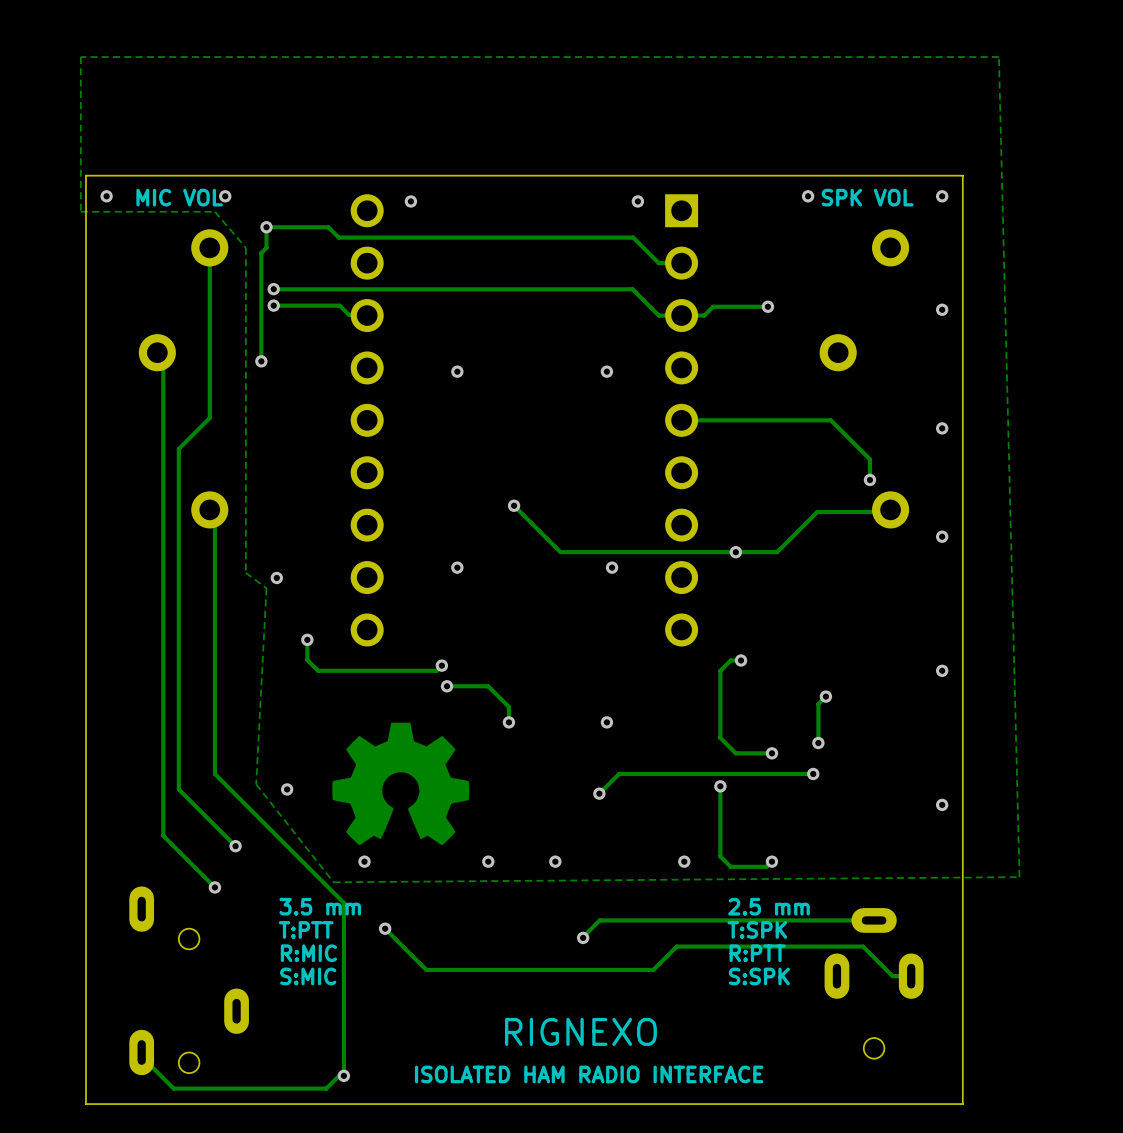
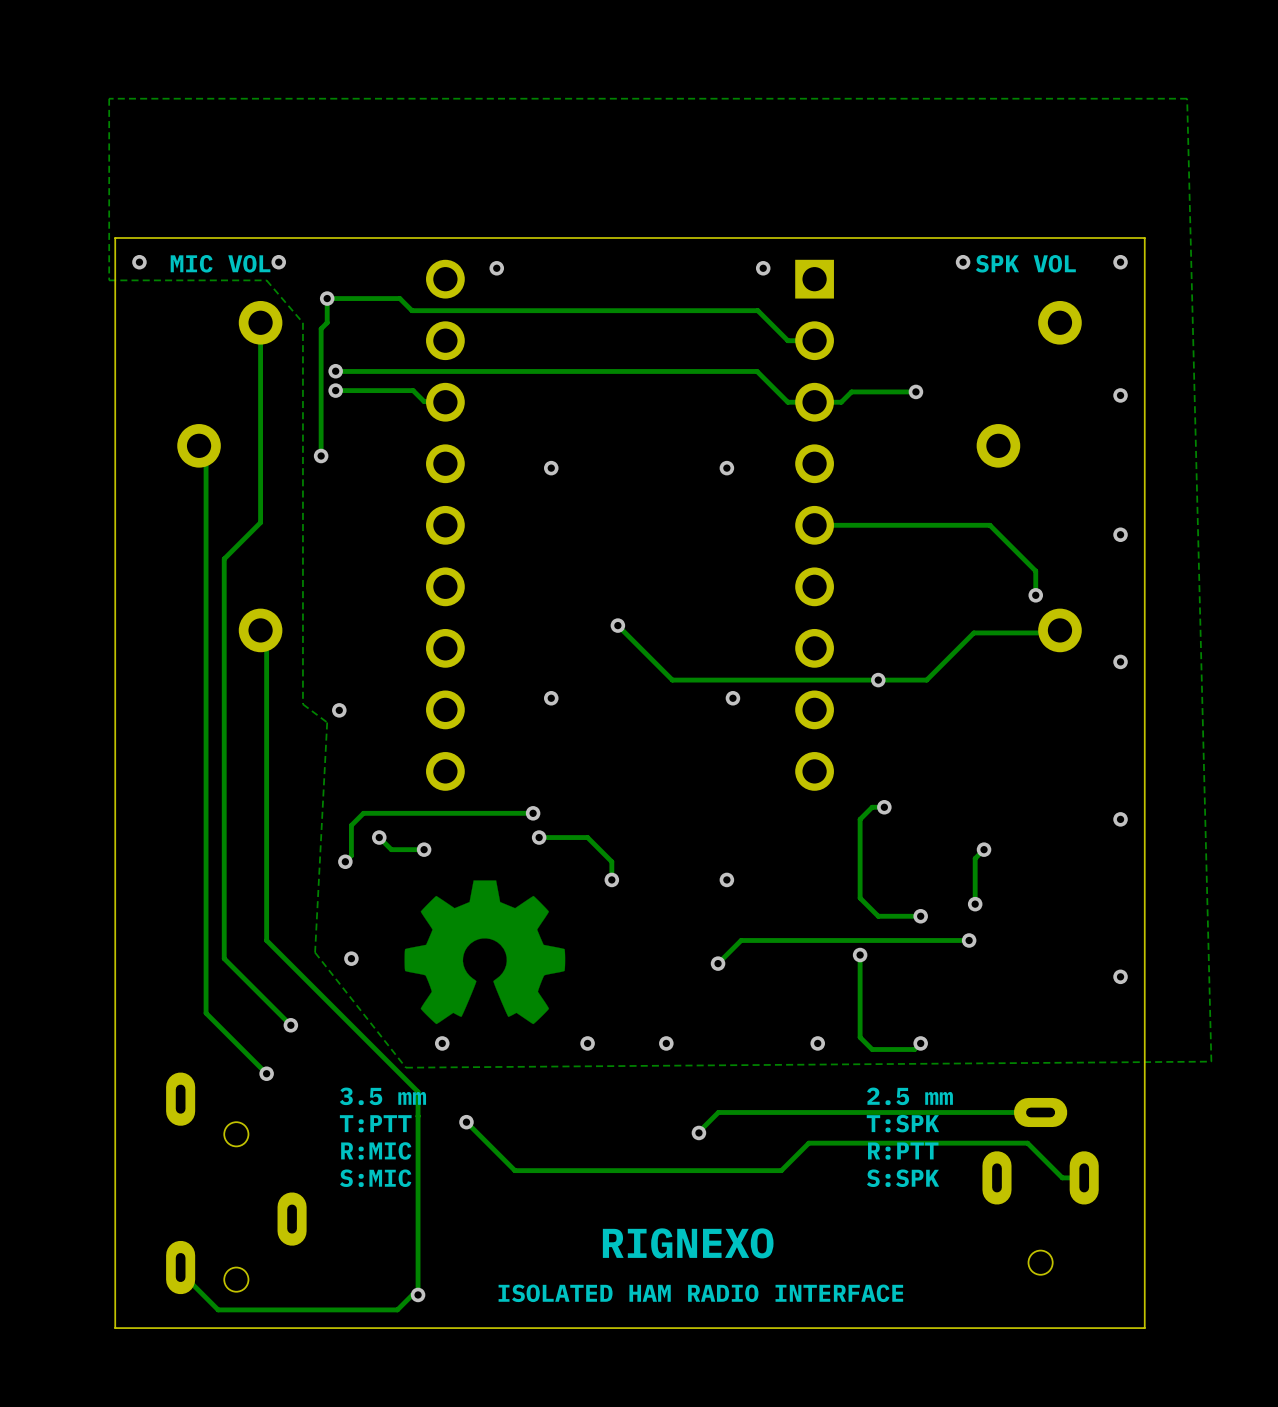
track: (307, 639) (307, 660) (318, 670) (436, 670) (441, 665) -> (345, 861) (351, 855) (351, 825) (363, 813) (533, 813)
via: (307, 639) -> none
track: none -> (379, 837) (391, 849) (424, 849)
via: none -> (379, 837)
via: none -> (424, 849)
via: none -> (345, 861)

